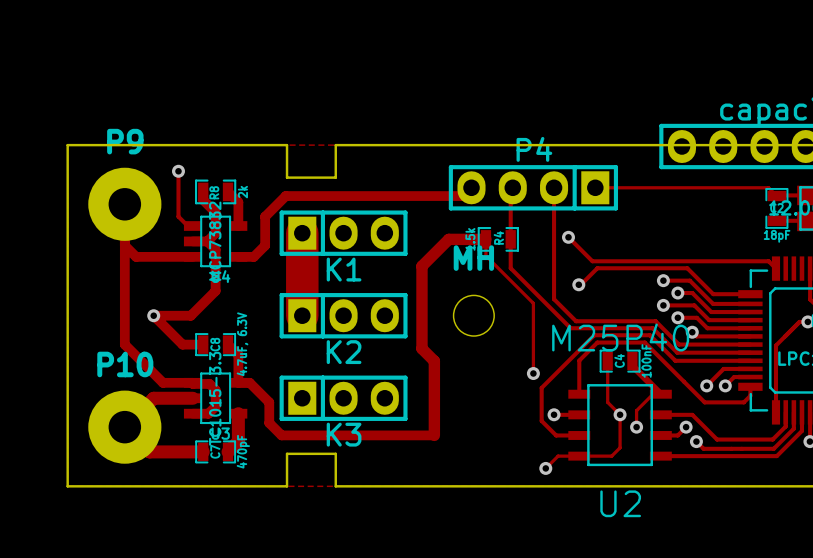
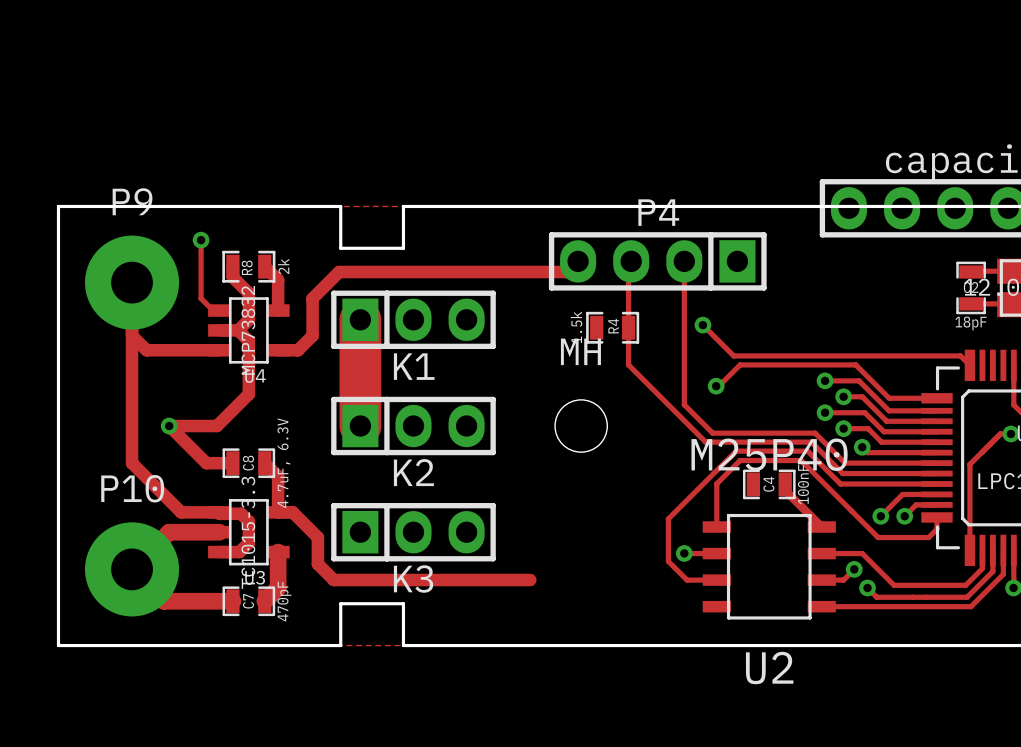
track: (595, 187) (768, 187) (776, 196) -> none
track: (607, 361) (607, 402) (620, 414) (620, 447) (611, 456) (558, 456) (545, 468) -> none
track: (533, 373) (533, 303) (485, 255) (485, 239) (448, 239) (421, 266) (421, 348) (434, 361) (434, 435) -> none
via: (533, 373) -> none
track: (660, 394) (653, 394) (636, 410) (636, 427) -> none
via: (620, 414) -> none
via: (636, 427) -> none
via: (545, 468) -> none

